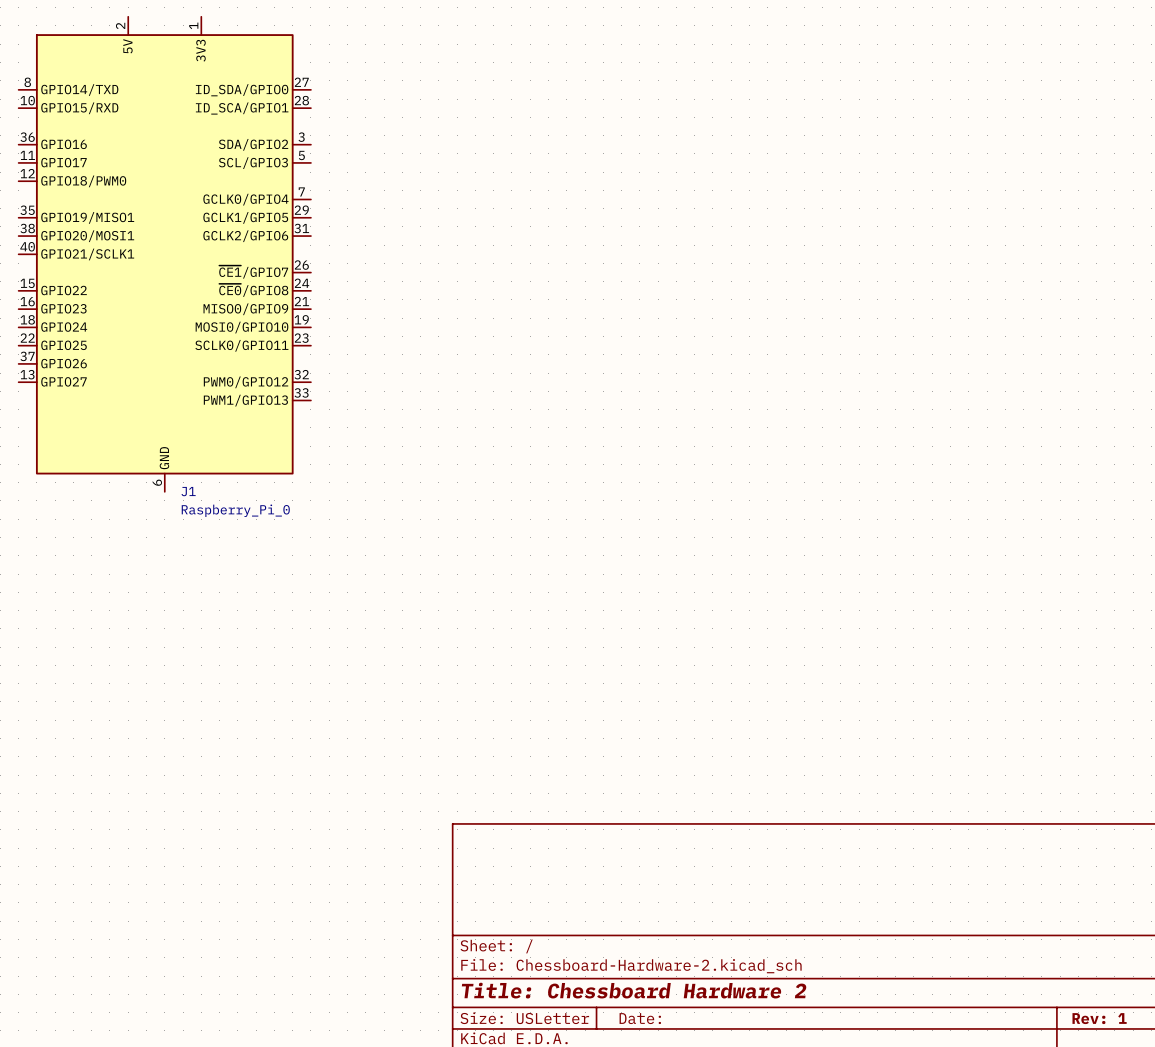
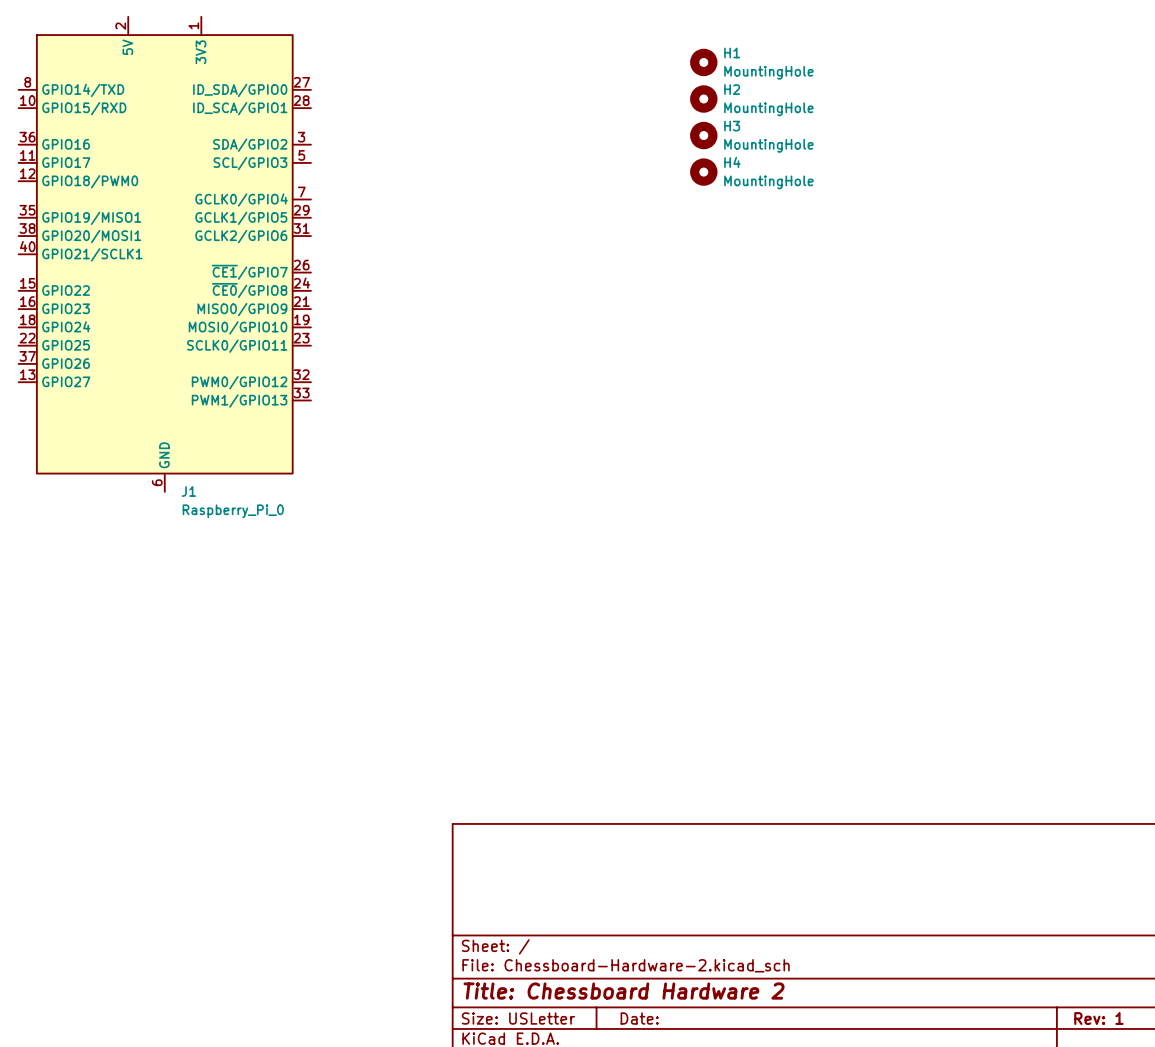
H1: none -> MountingHole (703, 62)
H2: none -> MountingHole (703, 99)
H3: none -> MountingHole (703, 135)
H4: none -> MountingHole (703, 172)

